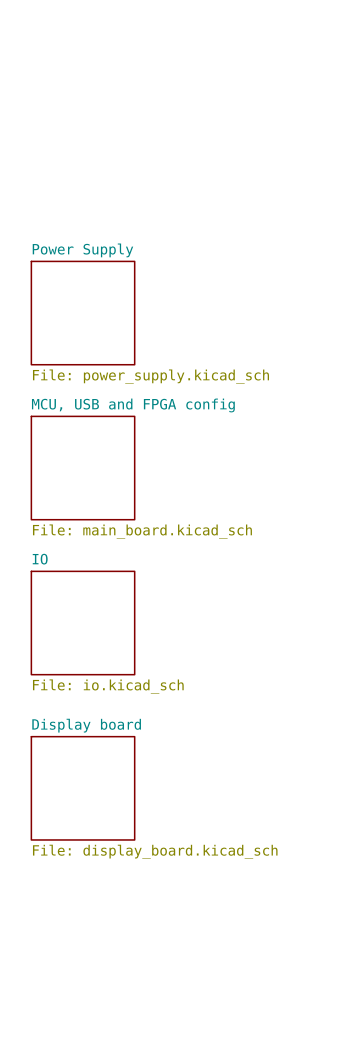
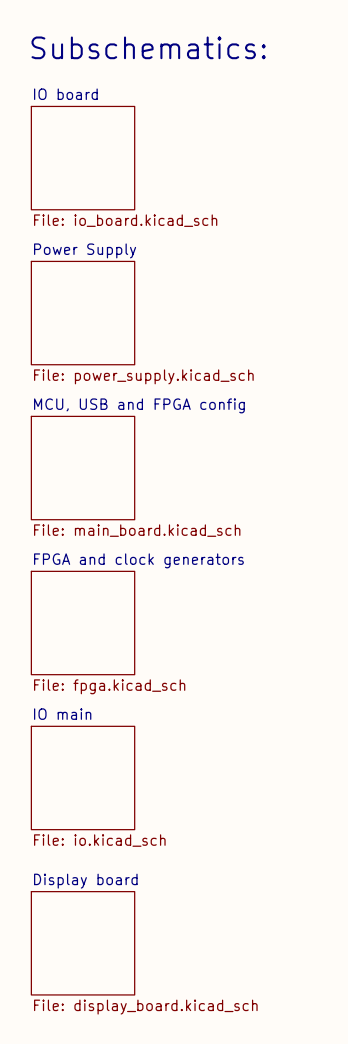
text: none -> Subschematics: (148, 47)
sheet IO board: none -> File: io_board.kicad_sch (83, 158)
sheet IO name: IO (40, 559) -> FPGA and clock generators (138, 560)
sheet IO value: File: io.kicad_sch (108, 686) -> File: fpga.kicad_sch (109, 686)
sheet IO main: none -> File: io.kicad_sch (83, 777)
sheet Display board position: (83, 788) -> (83, 943)

